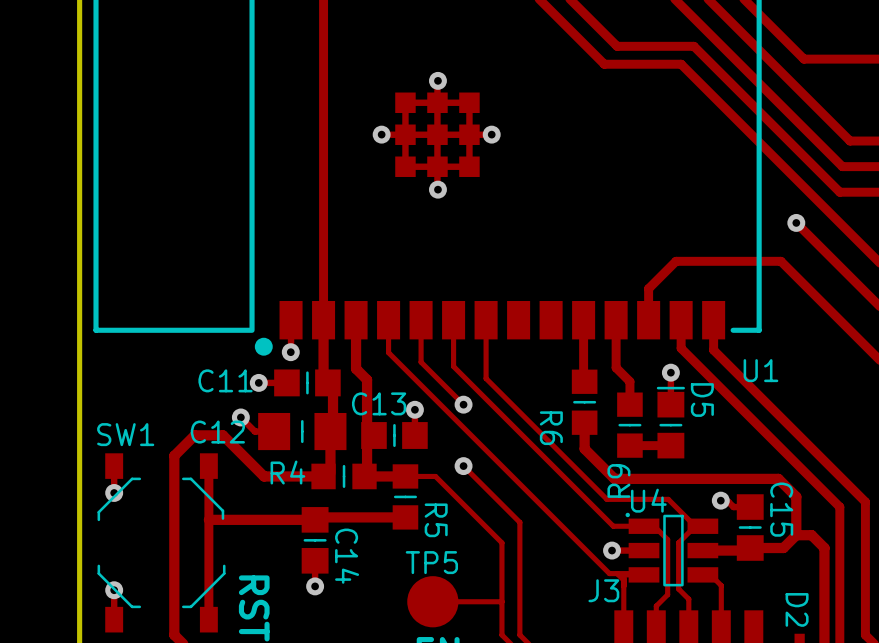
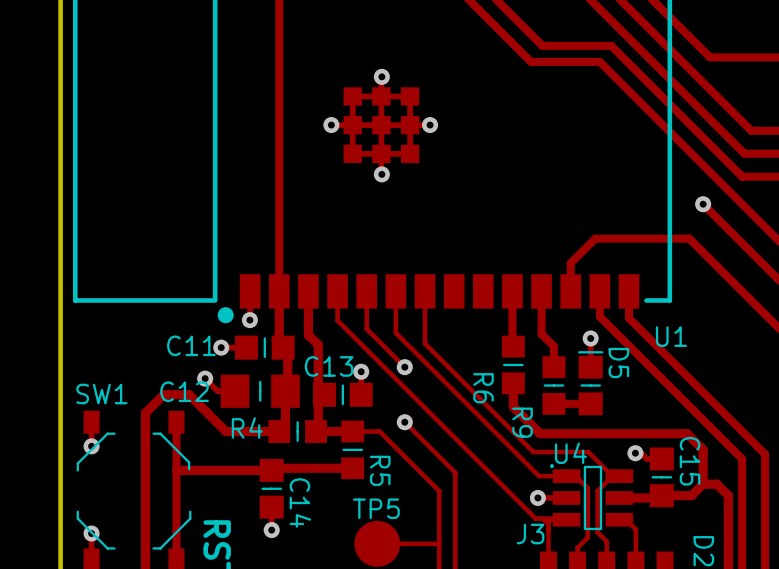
R9 name rotation: 0° (618, 480) -> 180° (522, 422)

